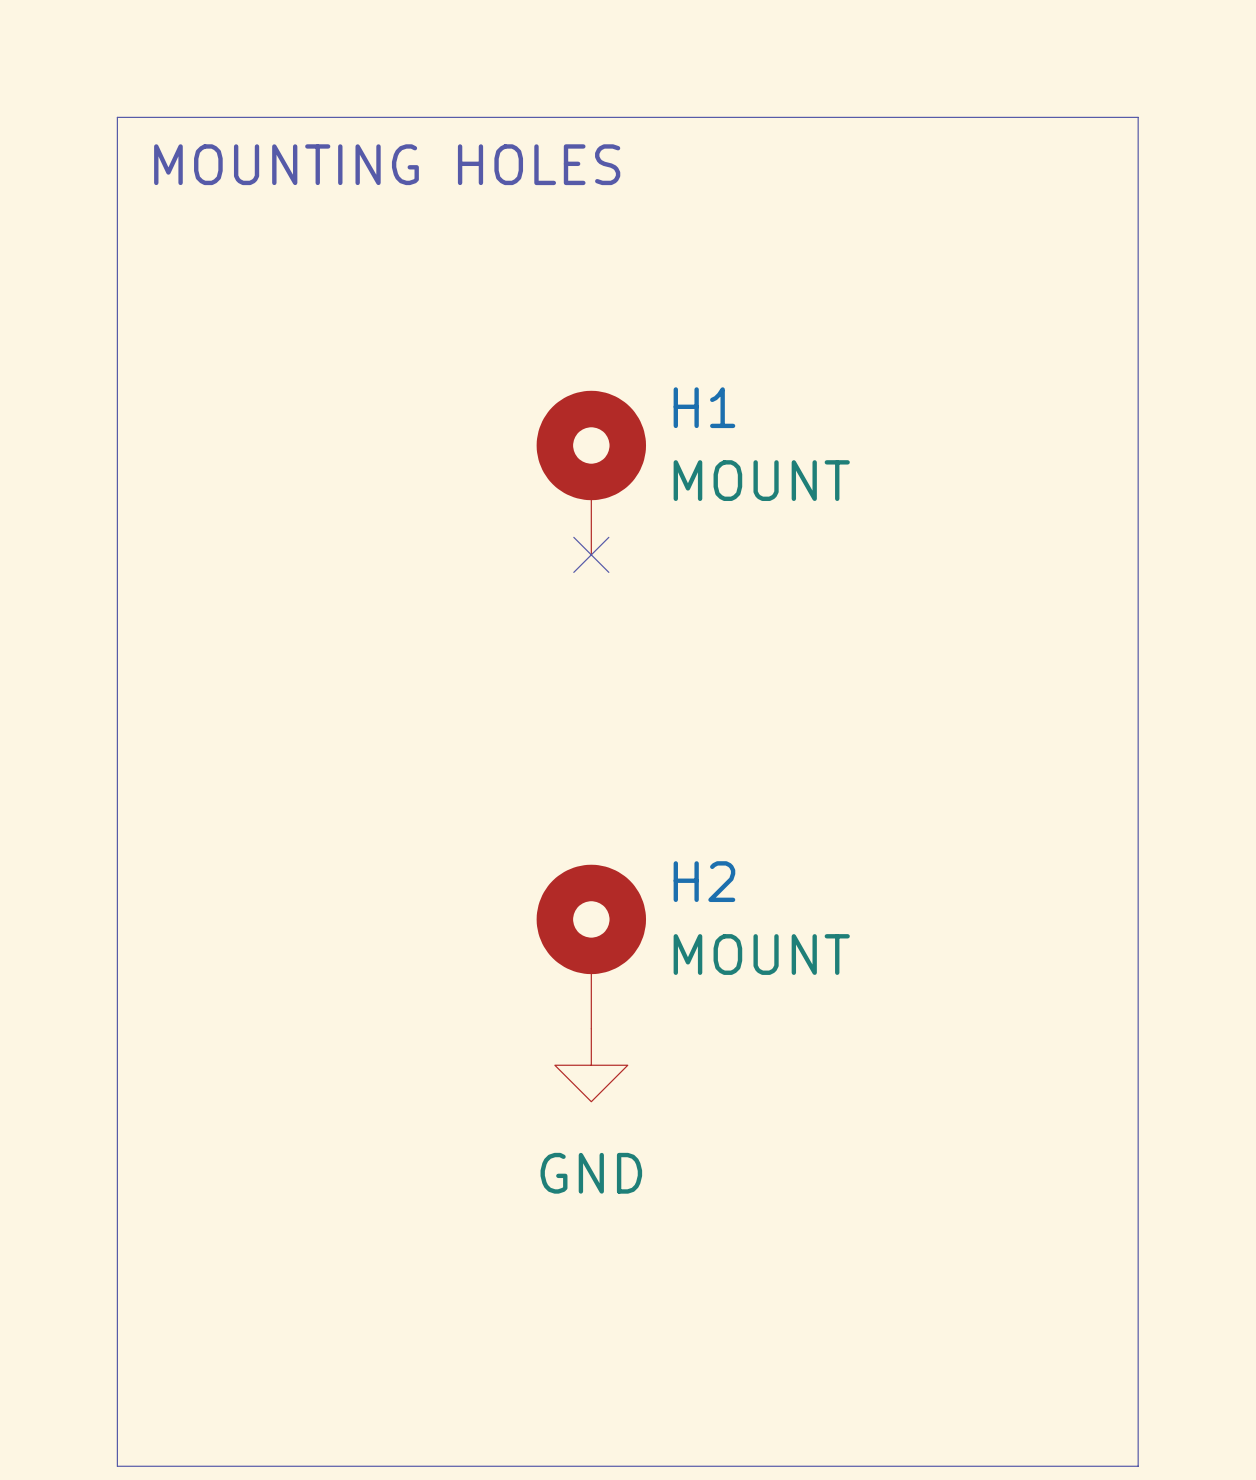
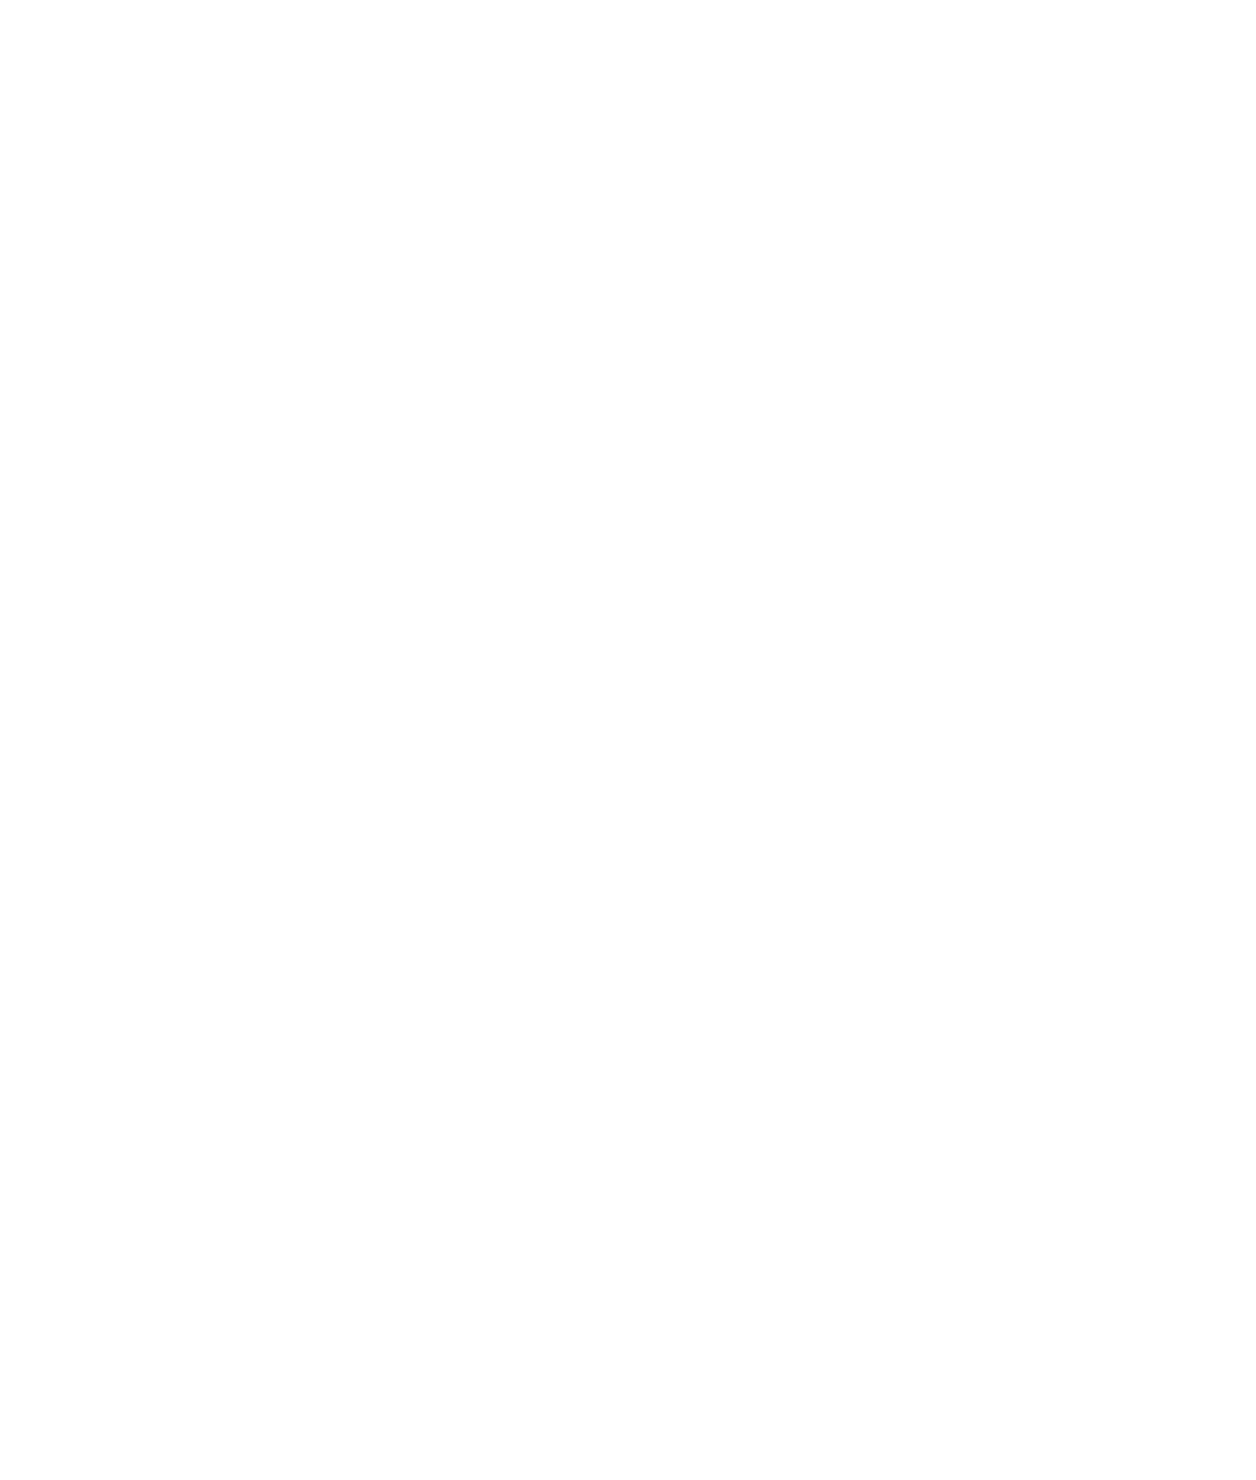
line: (117, 117) (1138, 117) (1138, 1466) (117, 1466) (117, 117) -> none
text: MOUNTING HOLES (387, 164) -> none
H1: MOUNT (591, 472) -> none
no-connect mark: (591, 554) -> none
H2: MOUNT (591, 946) -> none
power symbol: GND (591, 1065) -> none

